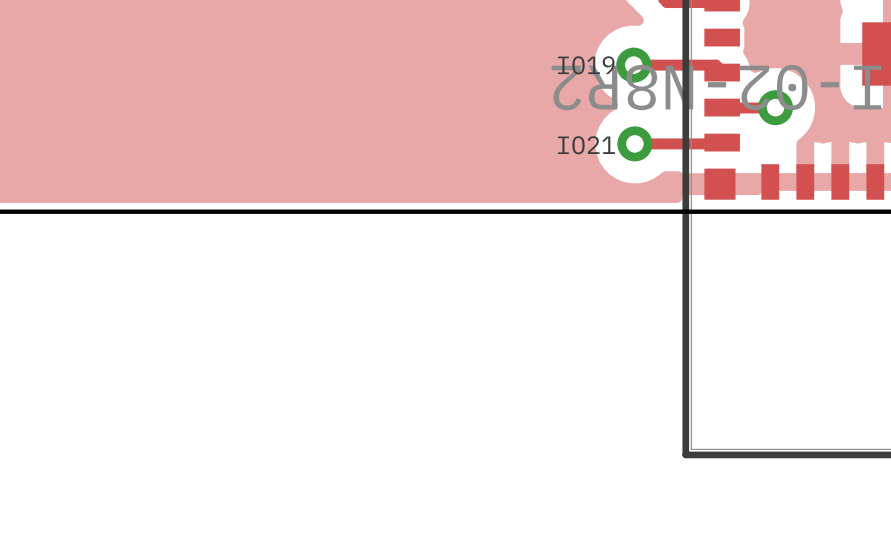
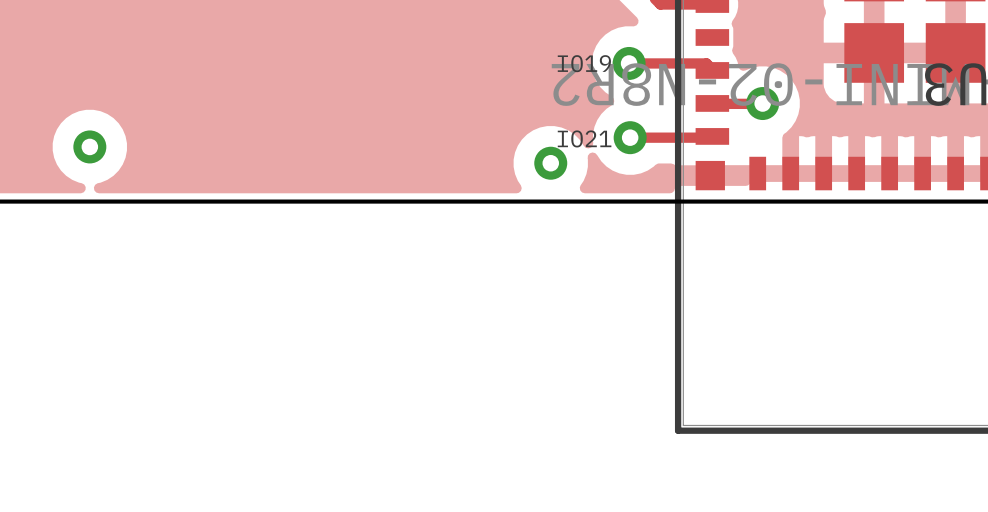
via: none -> (89, 146)
via: none -> (550, 163)

